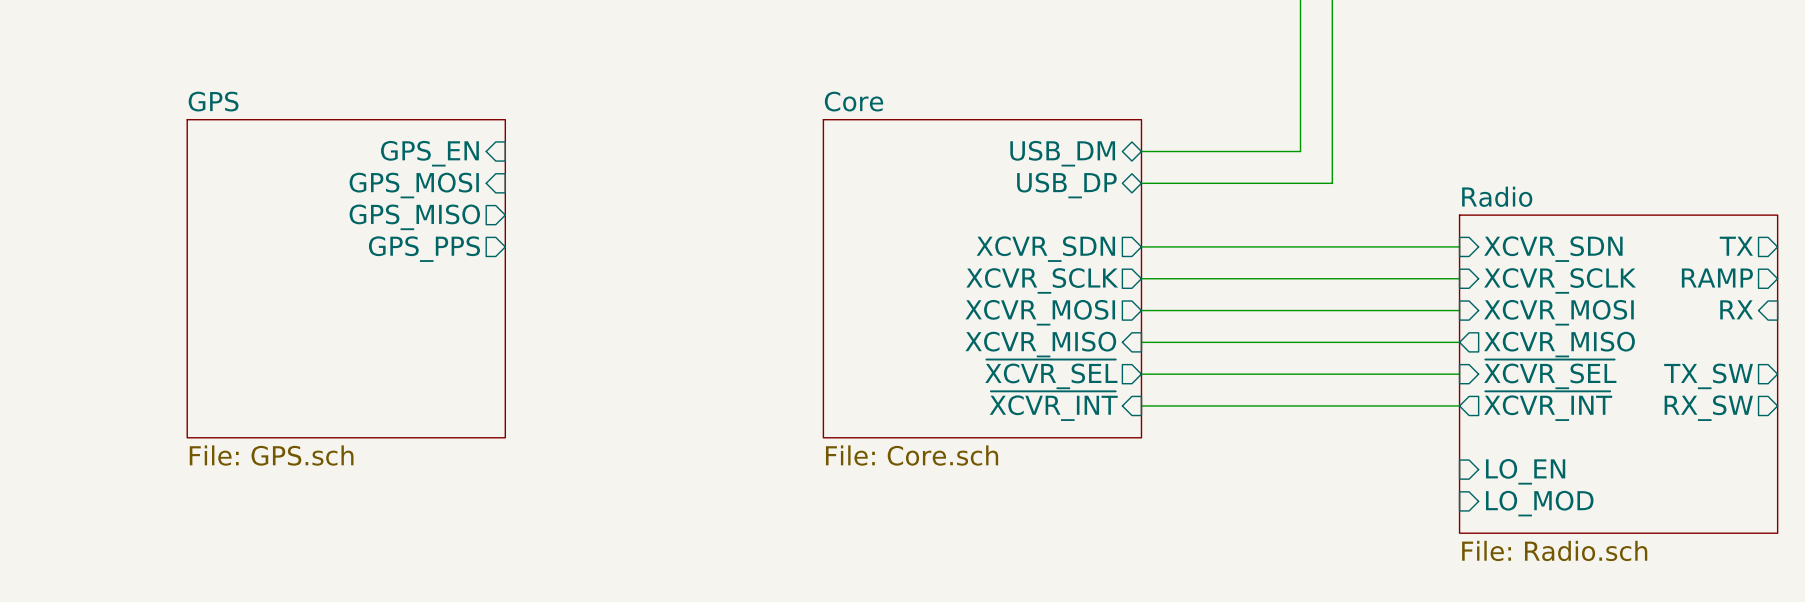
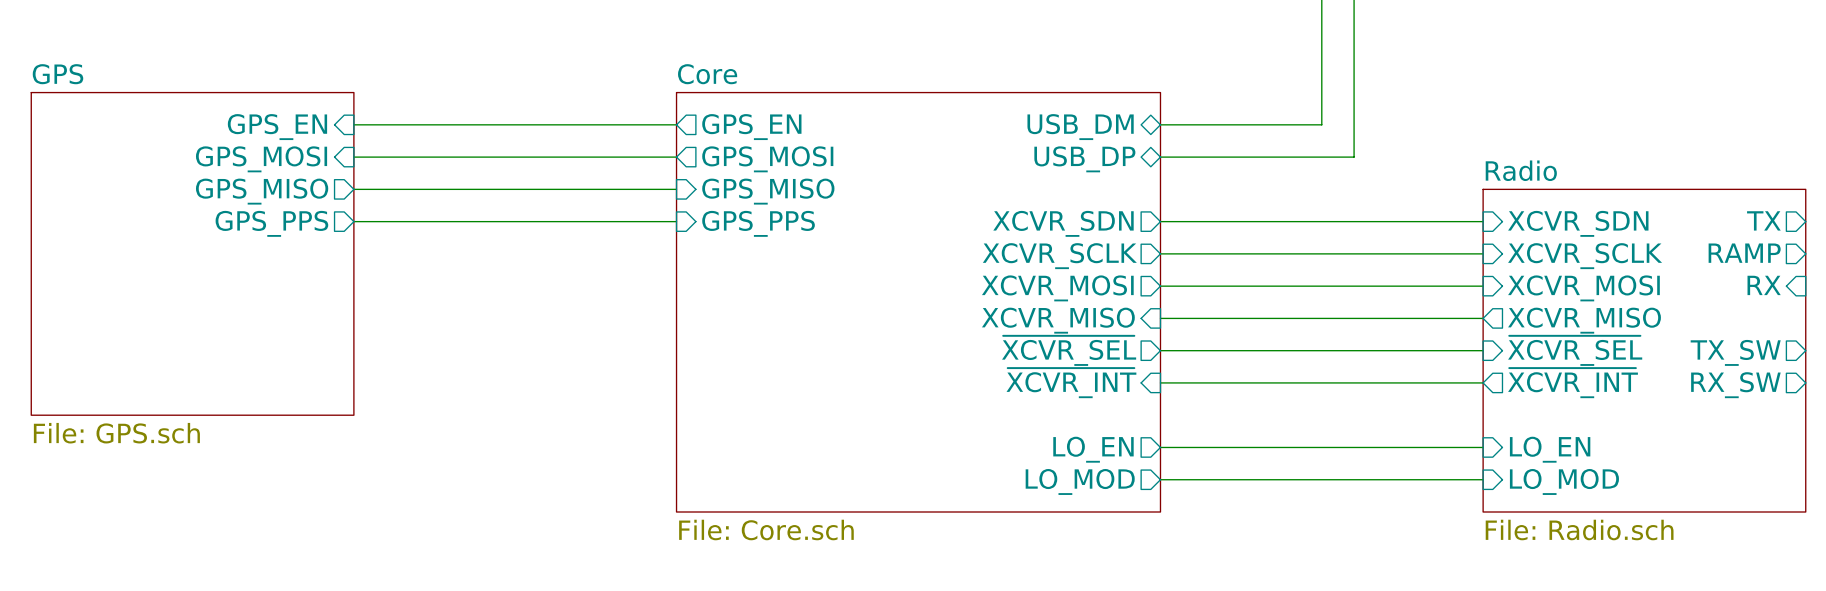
wire: none -> (353, 124) (676, 124)
sheet pin: none -> GPS_EN (277, 127)
sheet pin: GPS_EN (429, 153) -> none
sheet pin: none -> GPS_EN (751, 127)
wire: none -> (353, 157) (676, 157)
sheet pin: none -> GPS_MOSI (261, 159)
sheet pin: GPS_MOSI (414, 185) -> none
sheet pin: none -> GPS_MOSI (767, 159)
wire: none -> (353, 189) (676, 189)
sheet pin: none -> GPS_MISO (262, 191)
sheet pin: GPS_MISO (414, 217) -> none
sheet pin: none -> GPS_MISO (768, 191)
wire: none -> (353, 221) (676, 221)
sheet pin: none -> GPS_PPS (271, 223)
sheet pin: GPS_PPS (424, 249) -> none
sheet pin: none -> GPS_PPS (758, 223)
sheet GPS position: (346, 278) -> (192, 253)
sheet Core: File: Core.sch (982, 278) -> none
sheet Core: none -> File: Core.sch (918, 302)
wire: none -> (1160, 447) (1483, 447)
sheet pin: none -> LO_EN (1093, 449)
wire: none -> (1160, 479) (1483, 479)
sheet pin: none -> LO_MOD (1080, 481)

